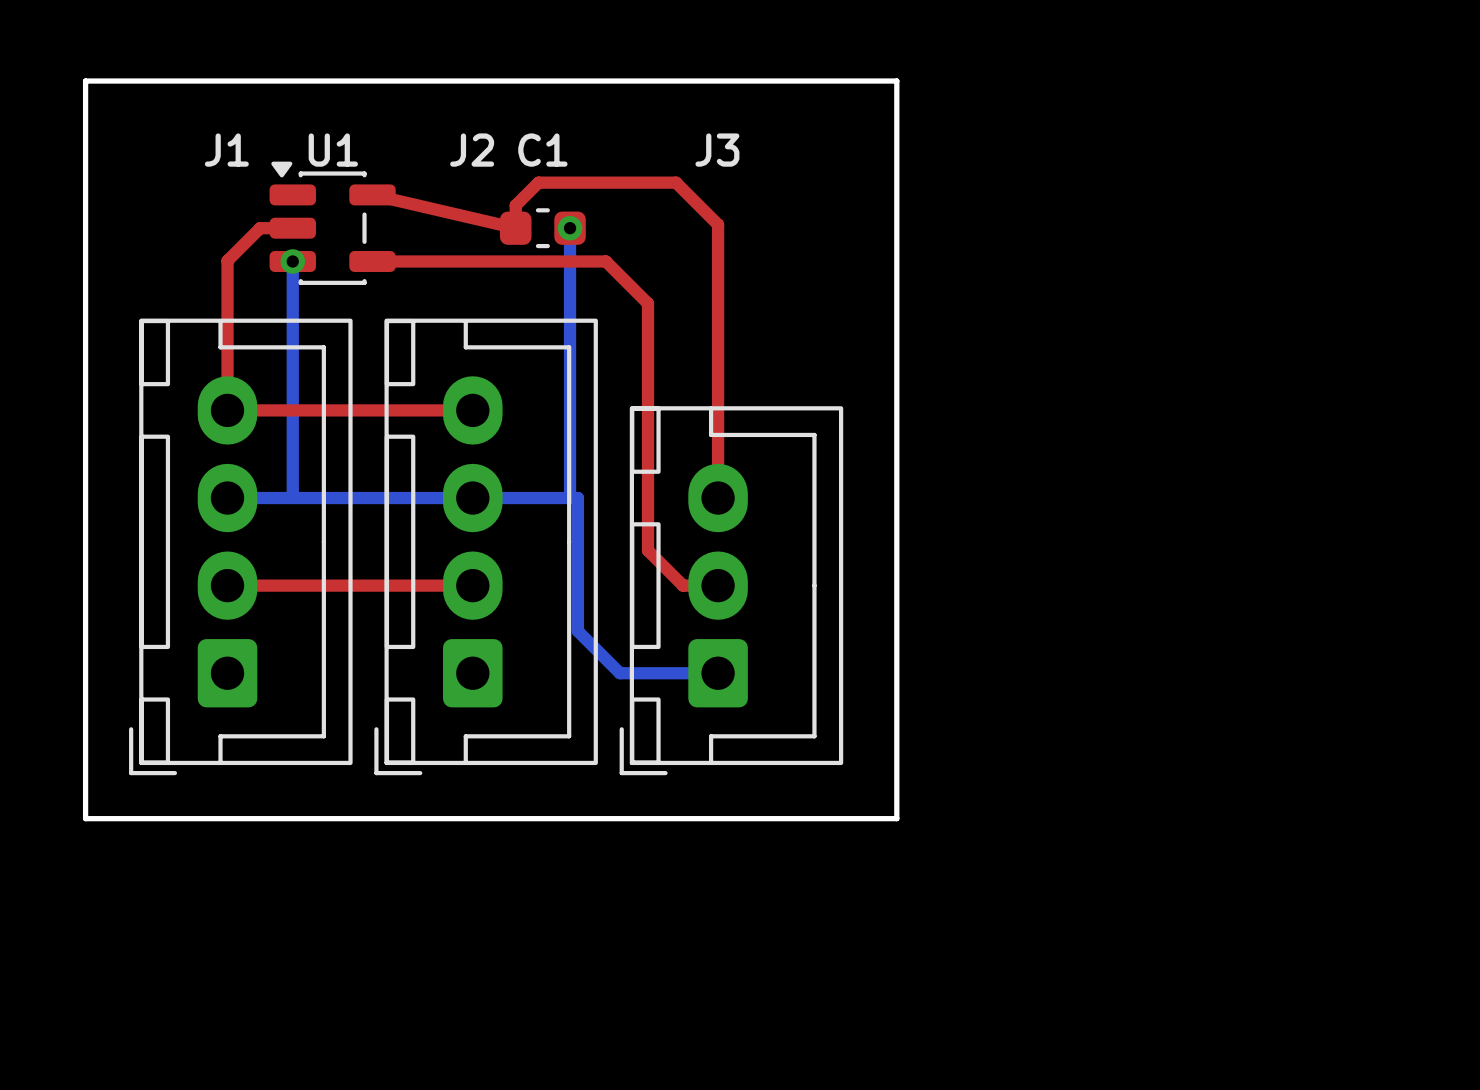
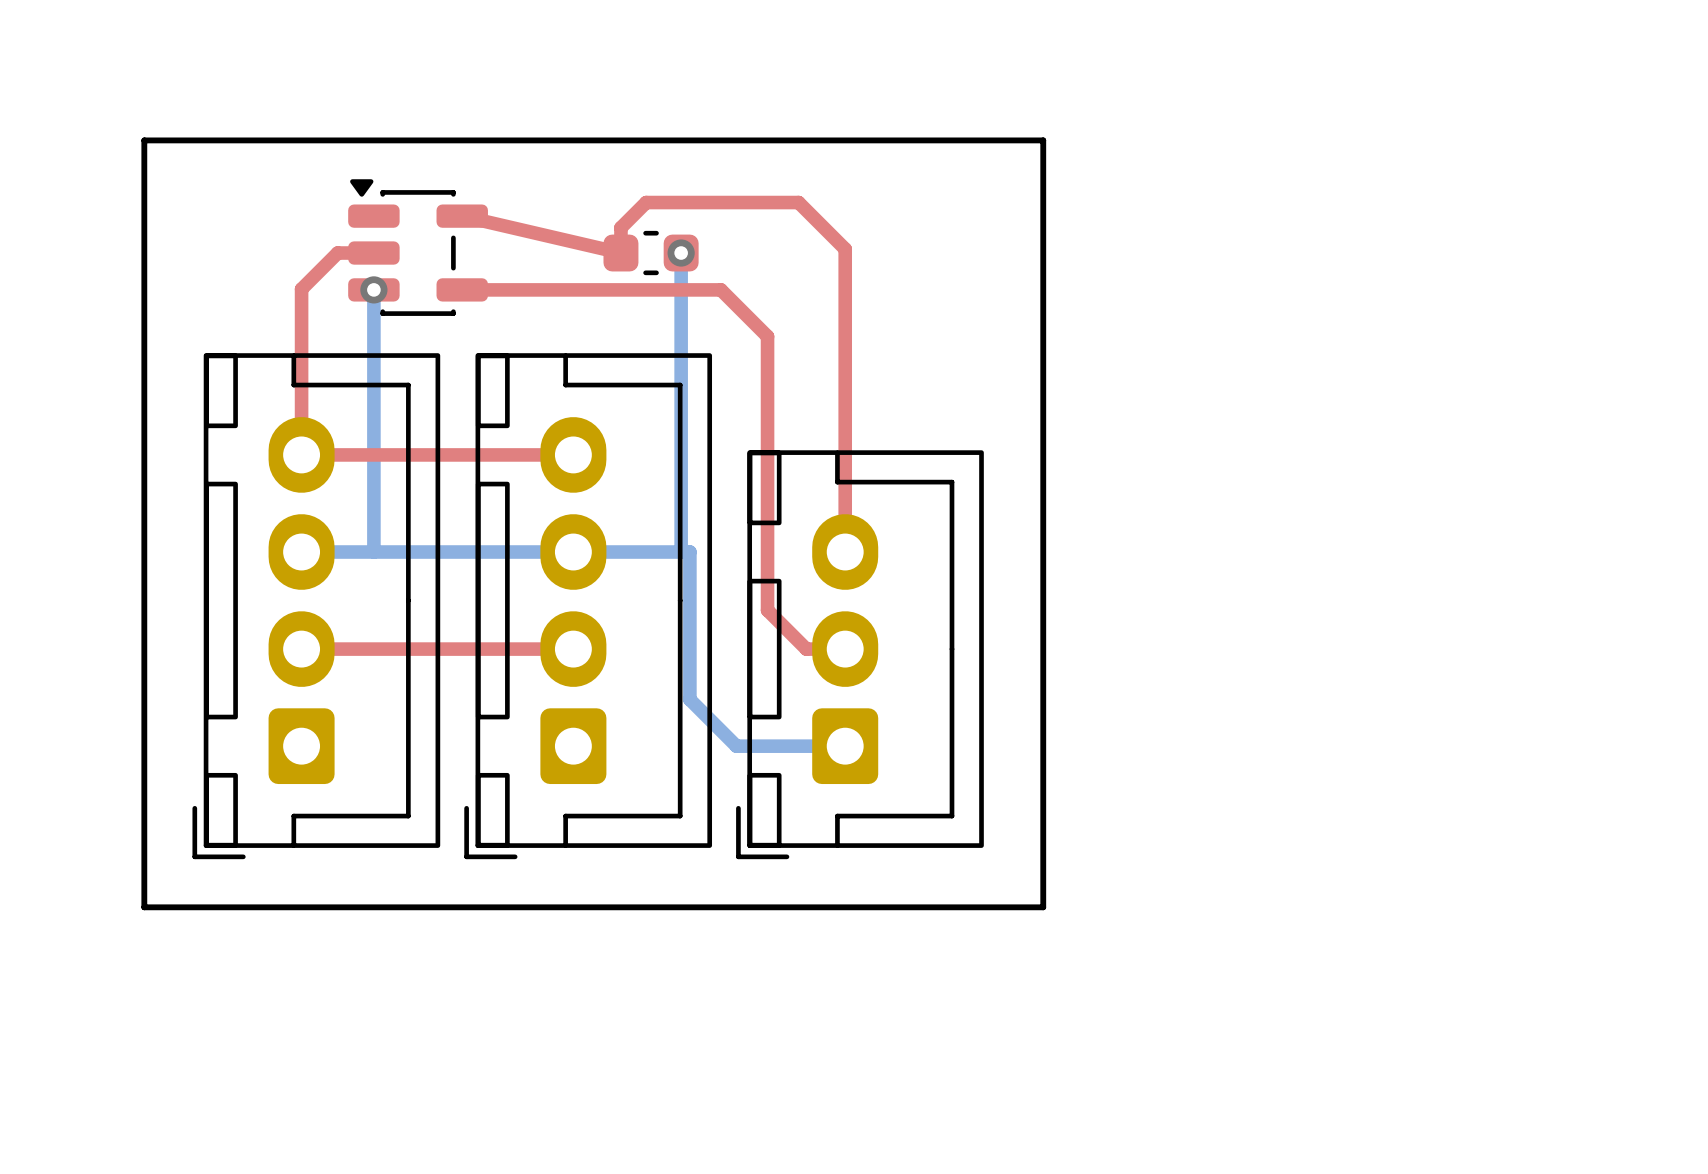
board edge: (85, 126) (85, 81) (896, 81) (896, 126) -> (144, 140) (1043, 140)
text: J1 (226, 150) -> none
text: U1 (333, 150) -> none
text: J2 (472, 150) -> none
text: C1 (542, 150) -> none
text: J3 (717, 150) -> none

